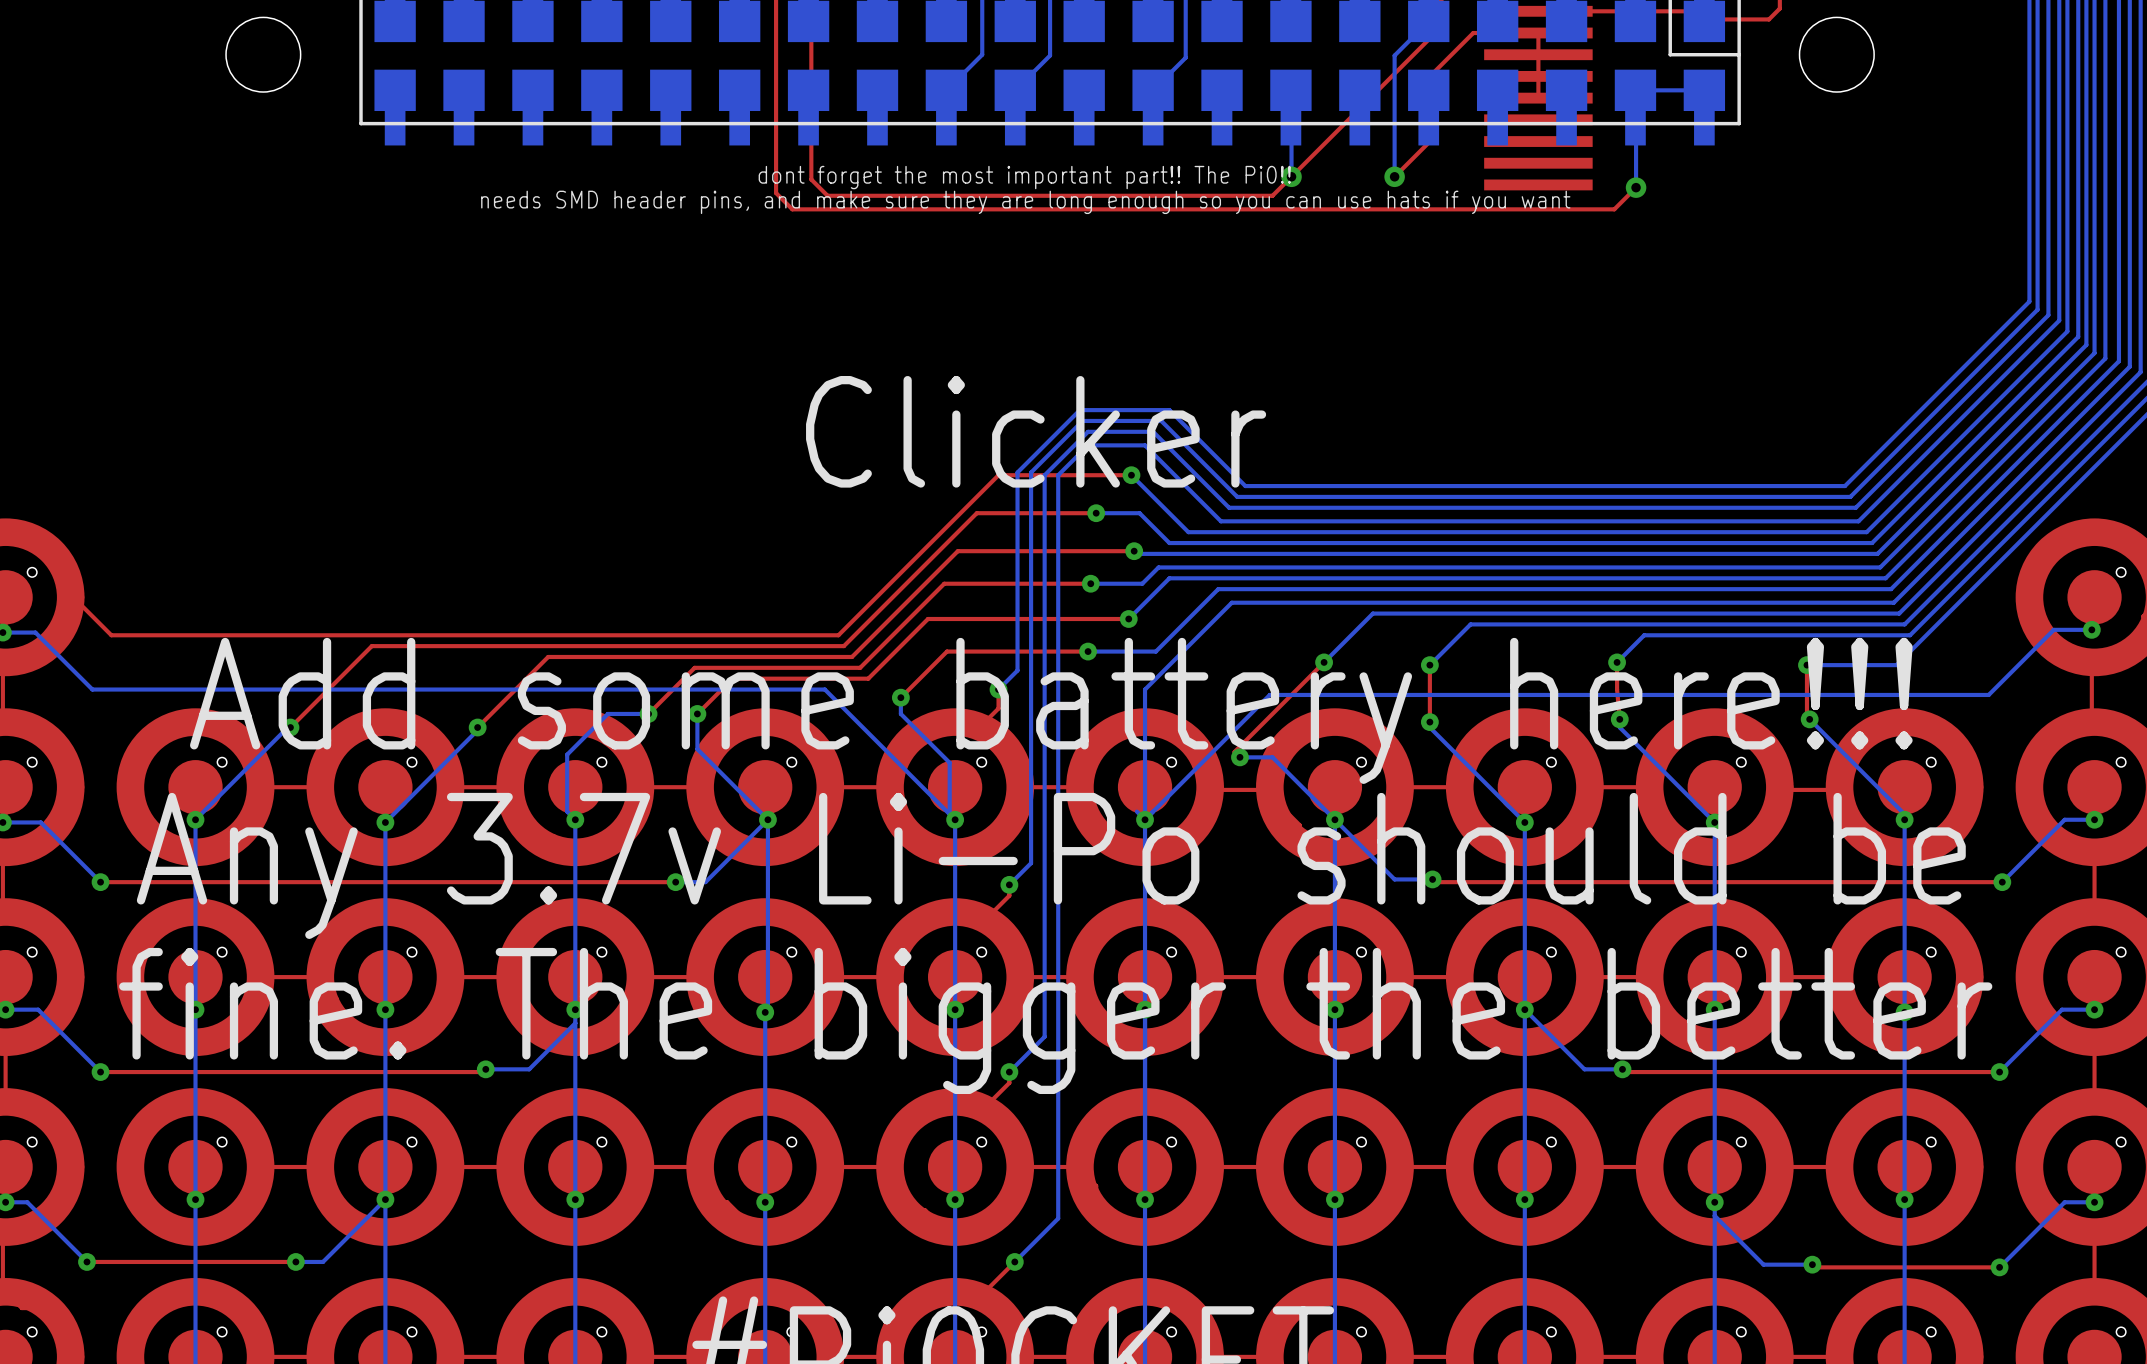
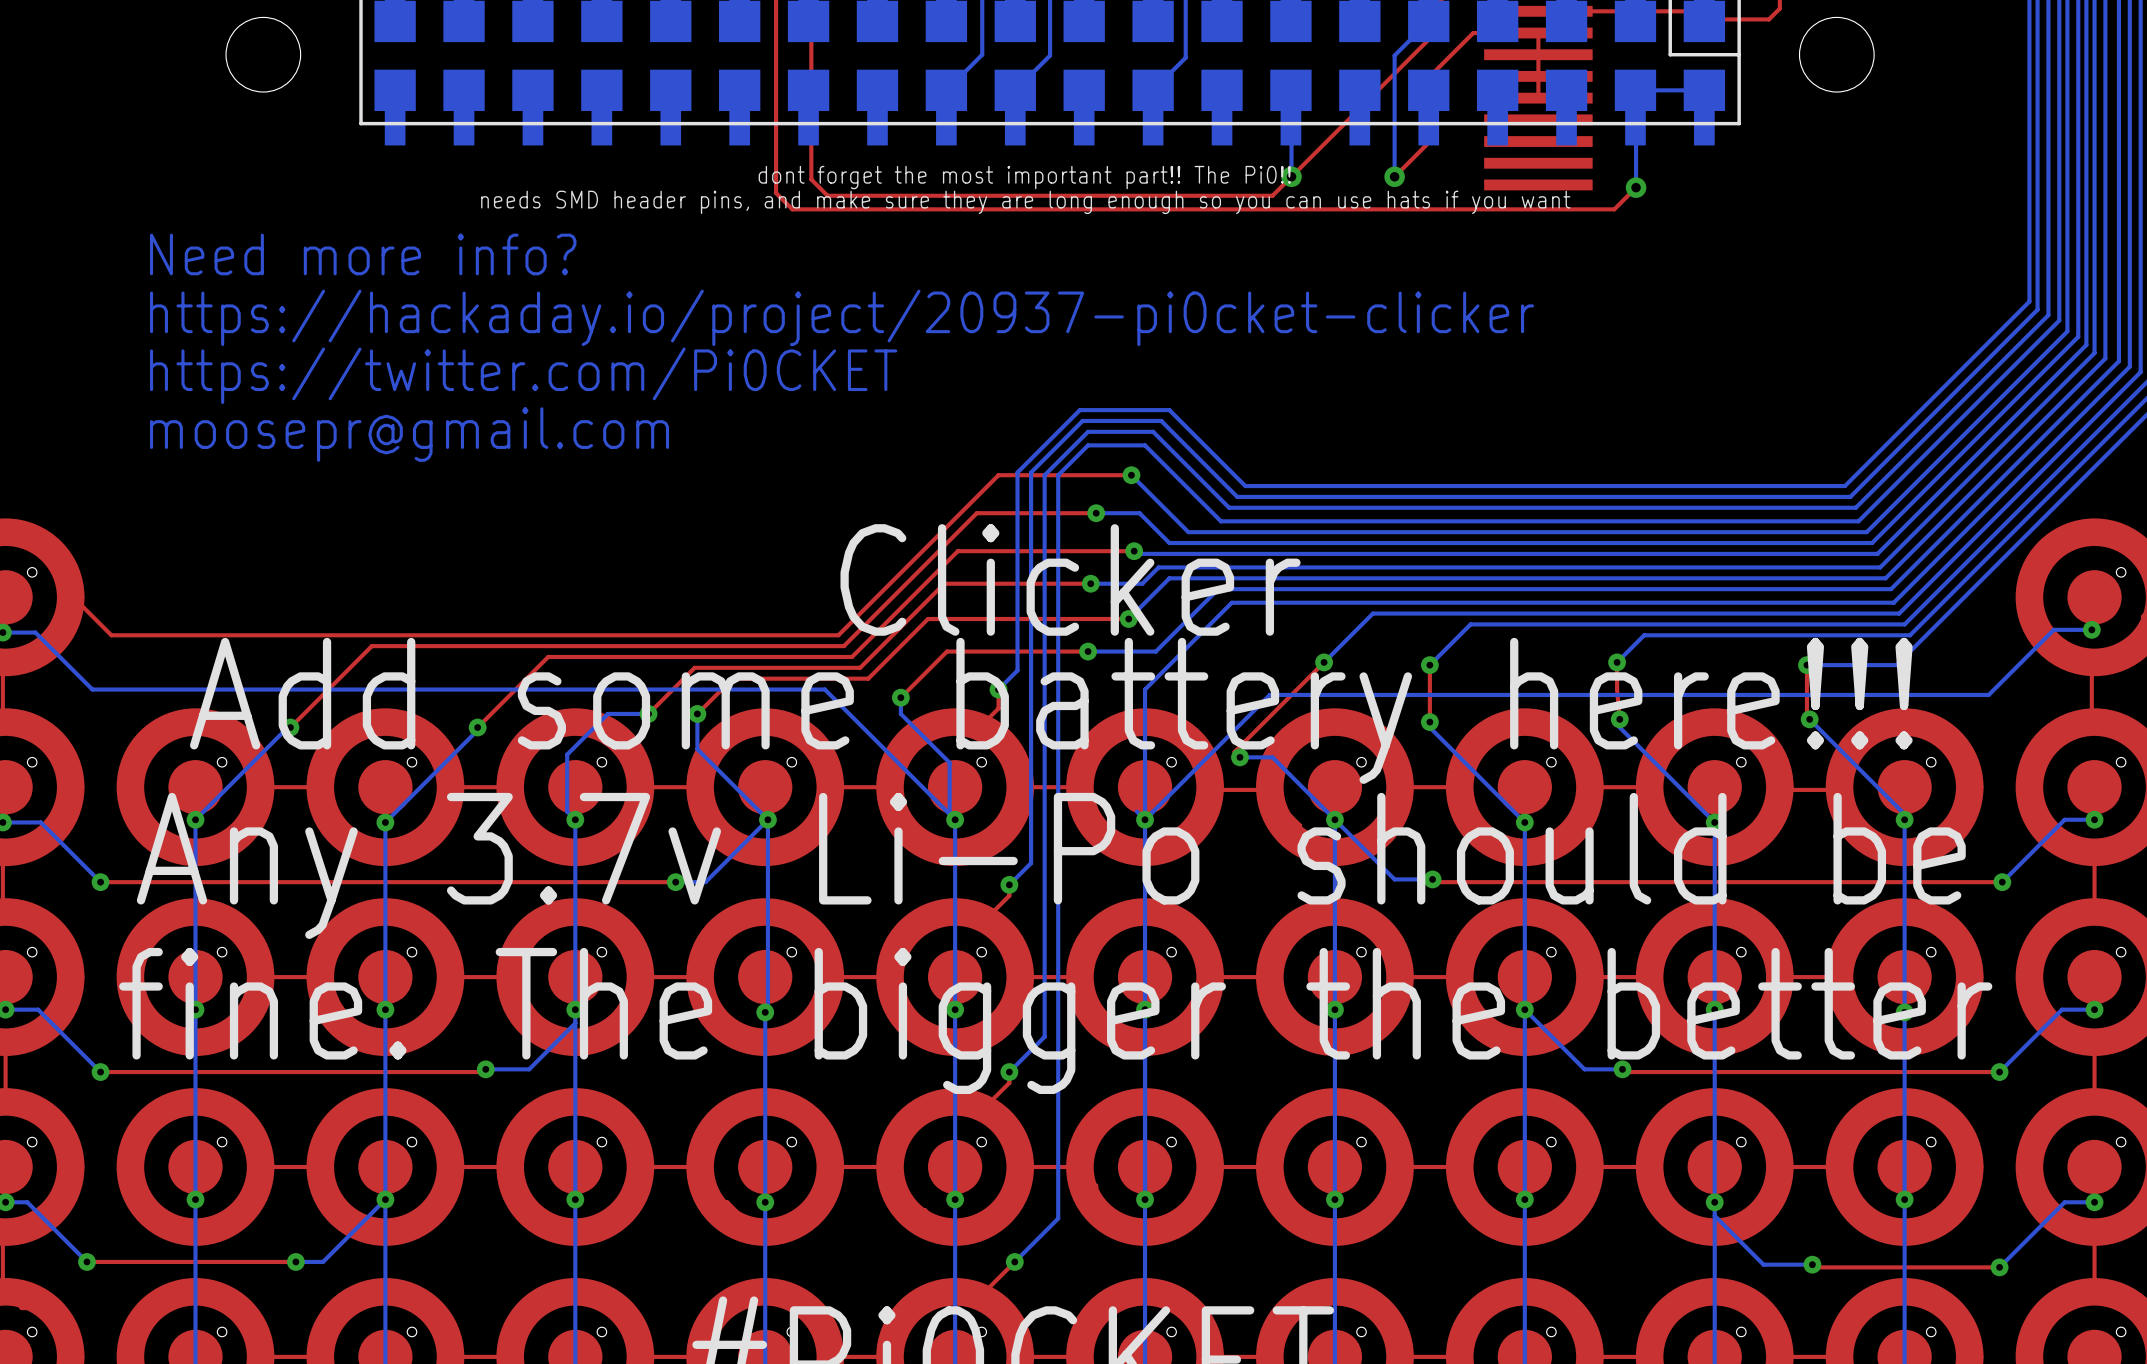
text: none -> Need more info? (363, 254)
text: none -> https://hackaday.io/project/20937-pi0cket-clicker (842, 317)
text: none -> https://twitter.com/Pi0CKET (523, 375)
text position: Clicker (1036, 431) -> Clicker (1070, 579)
text: none -> moosepr@gmail.com (409, 434)

